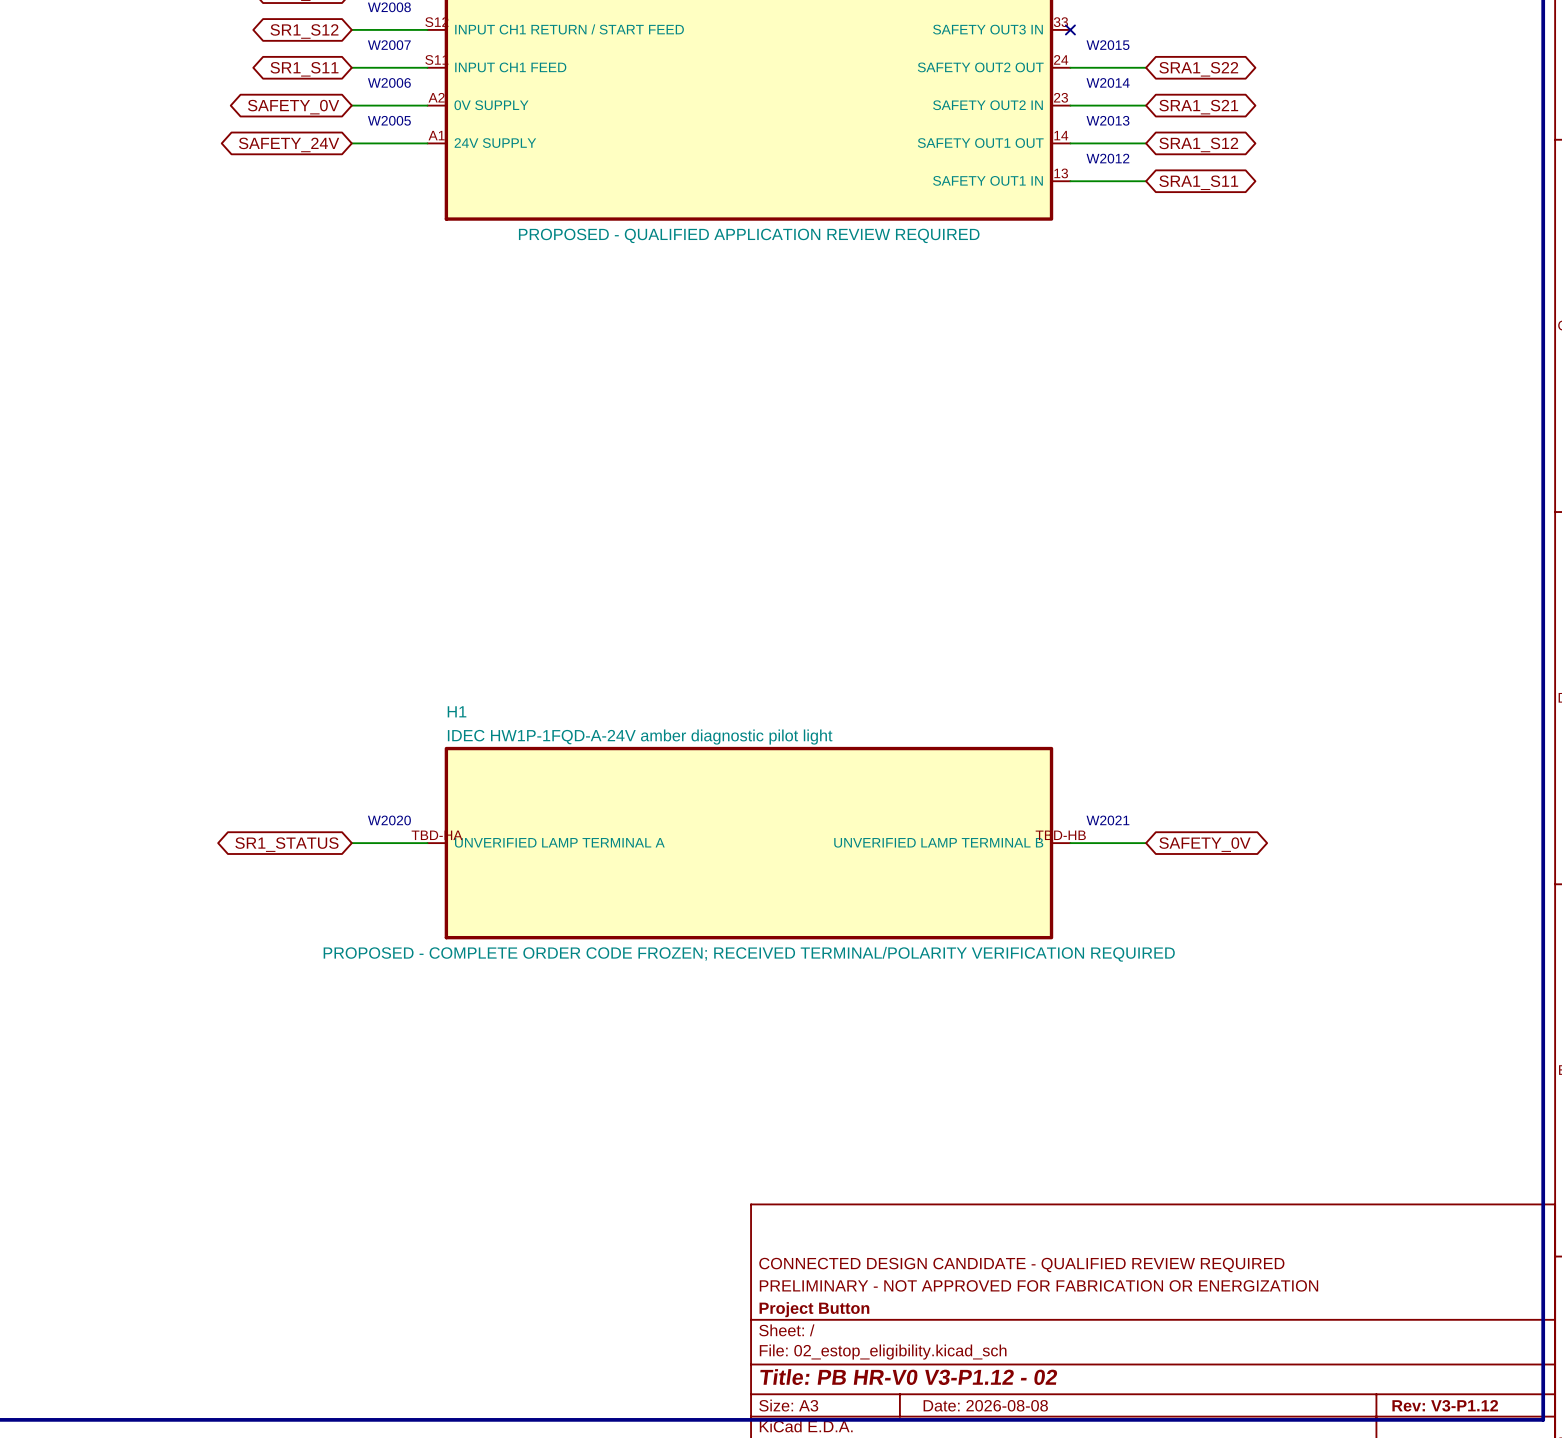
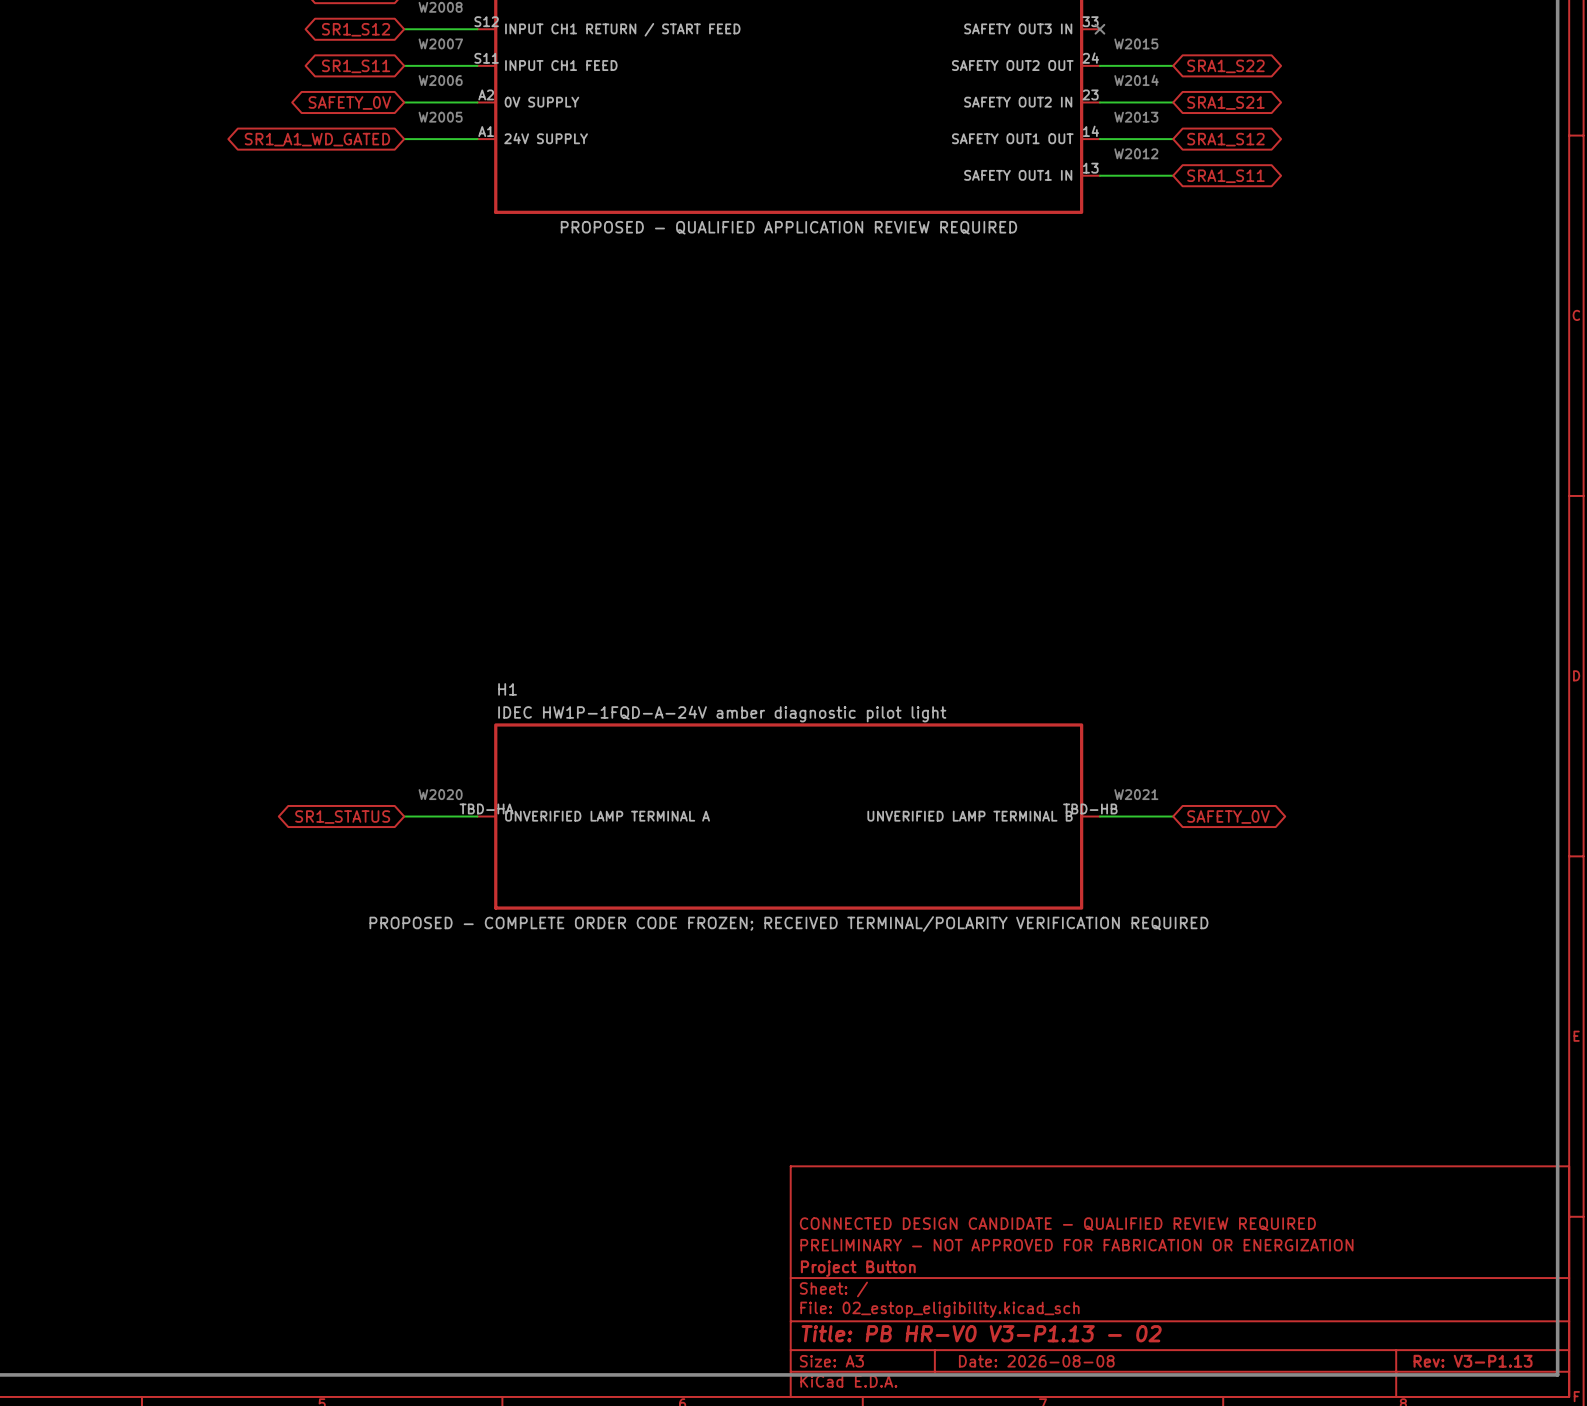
global label: SAFETY_24V (289, 144) -> SR1_A1_WD_GATED (317, 139)
title block: Title: PB HR-V0 V3-P1.12 - 02 (908, 1377) -> Title: PB HR-V0 V3-P1.13 - 02 (981, 1333)
title block: Rev: V3-P1.12 (1445, 1405) -> Rev: V3-P1.13 (1473, 1361)

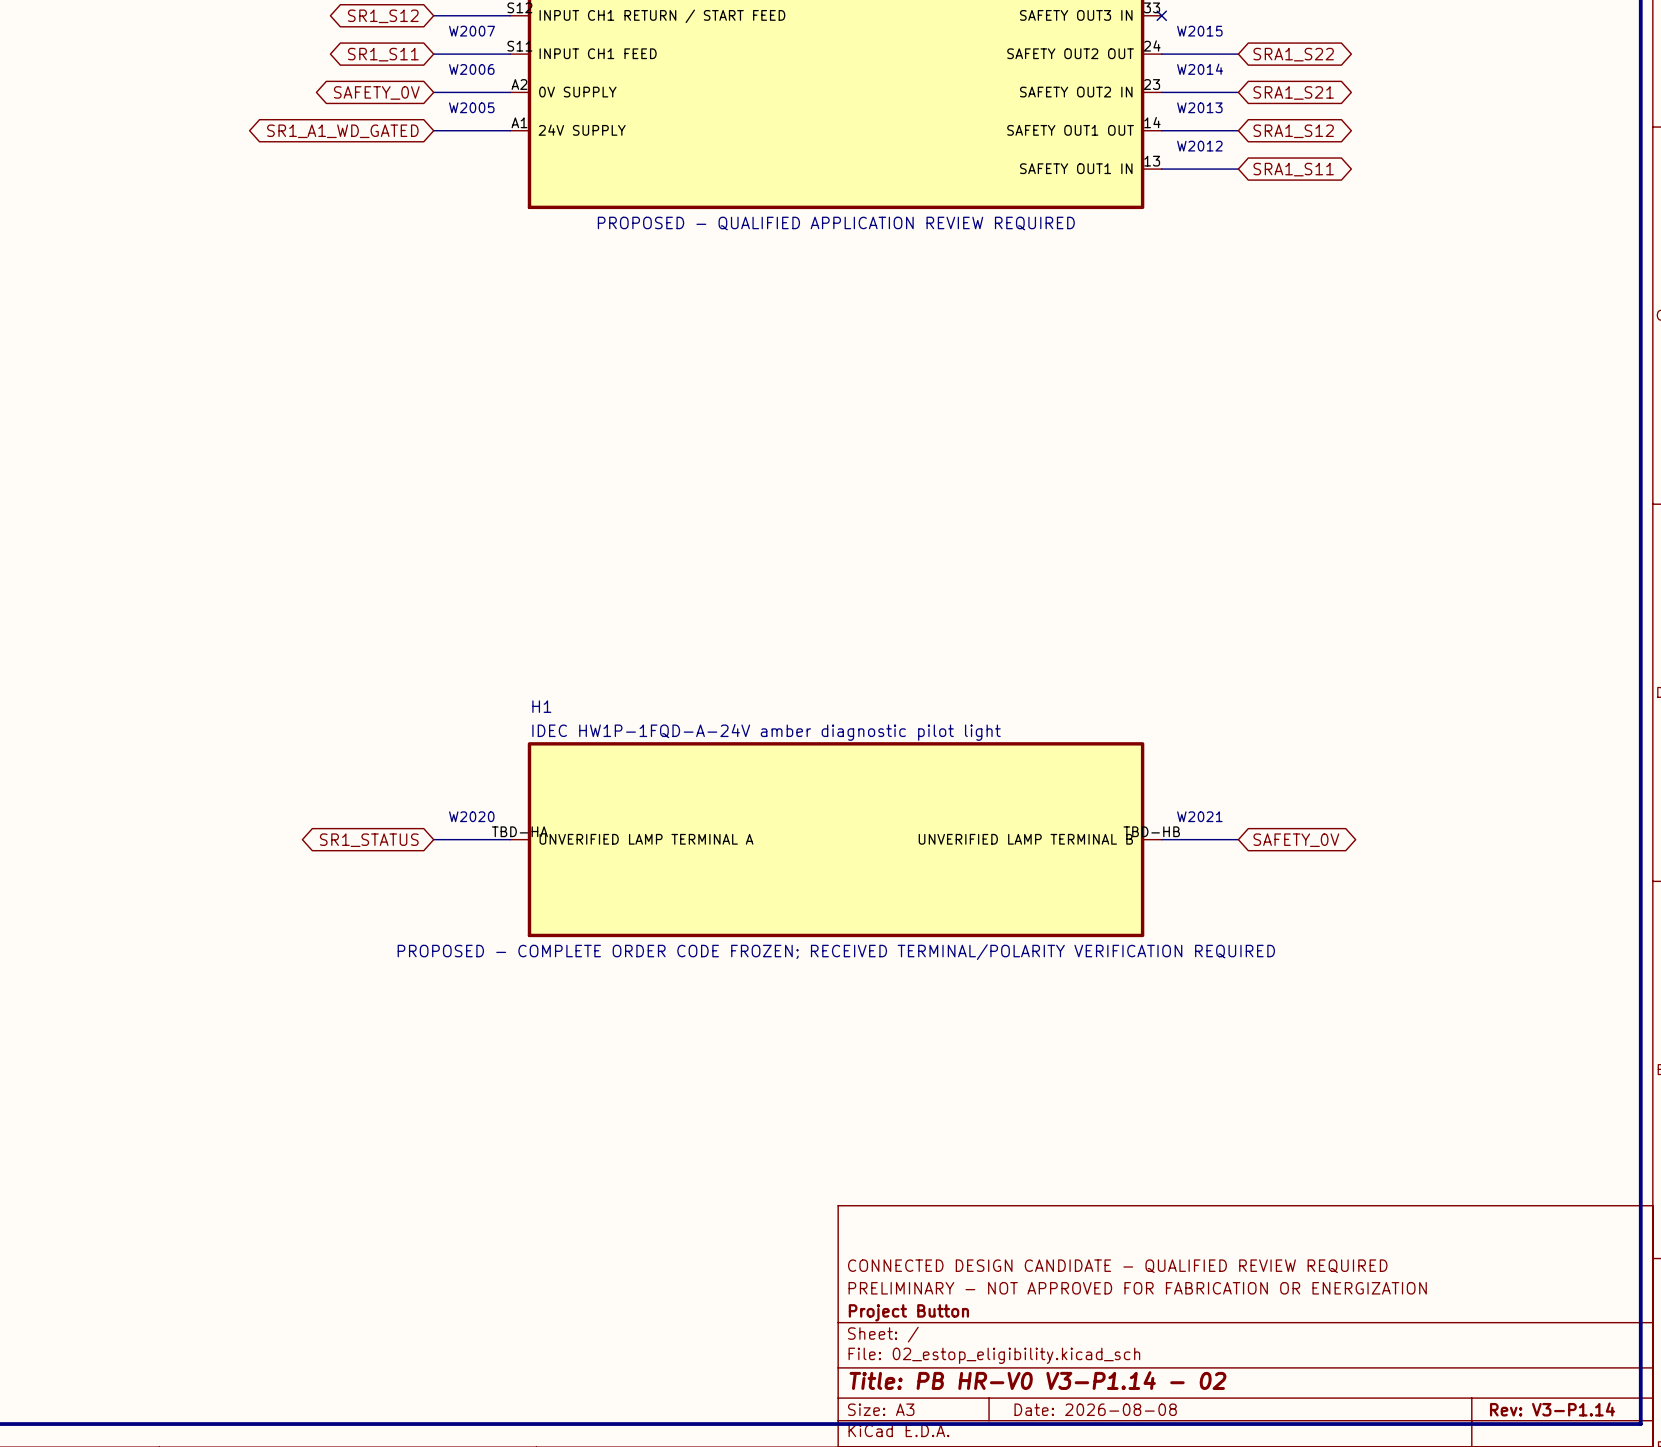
title block: Title: PB HR-V0 V3-P1.13 - 02 (981, 1333) -> Title: PB HR-V0 V3-P1.14 - 02 (1037, 1380)
title block: Rev: V3-P1.13 (1473, 1361) -> Rev: V3-P1.14 (1552, 1409)

